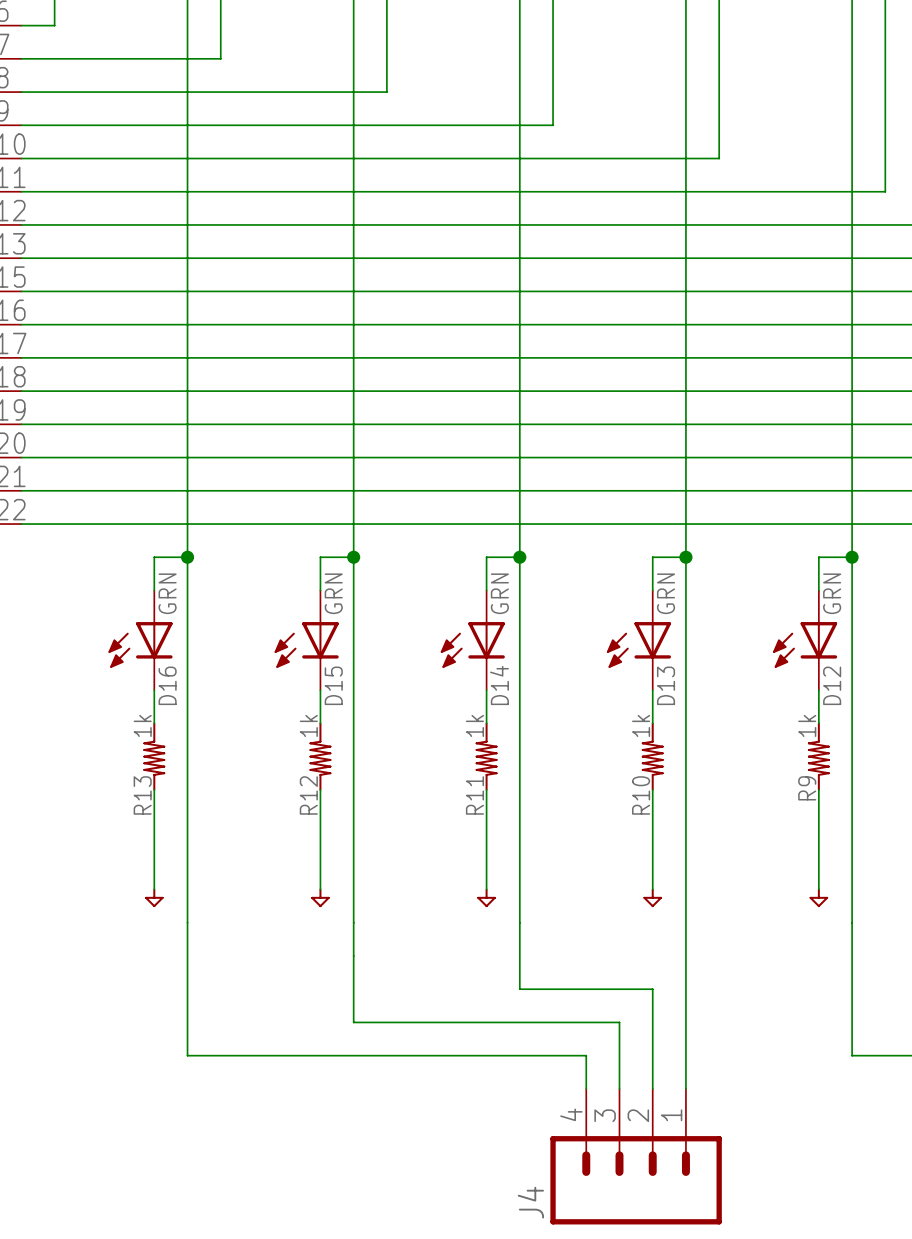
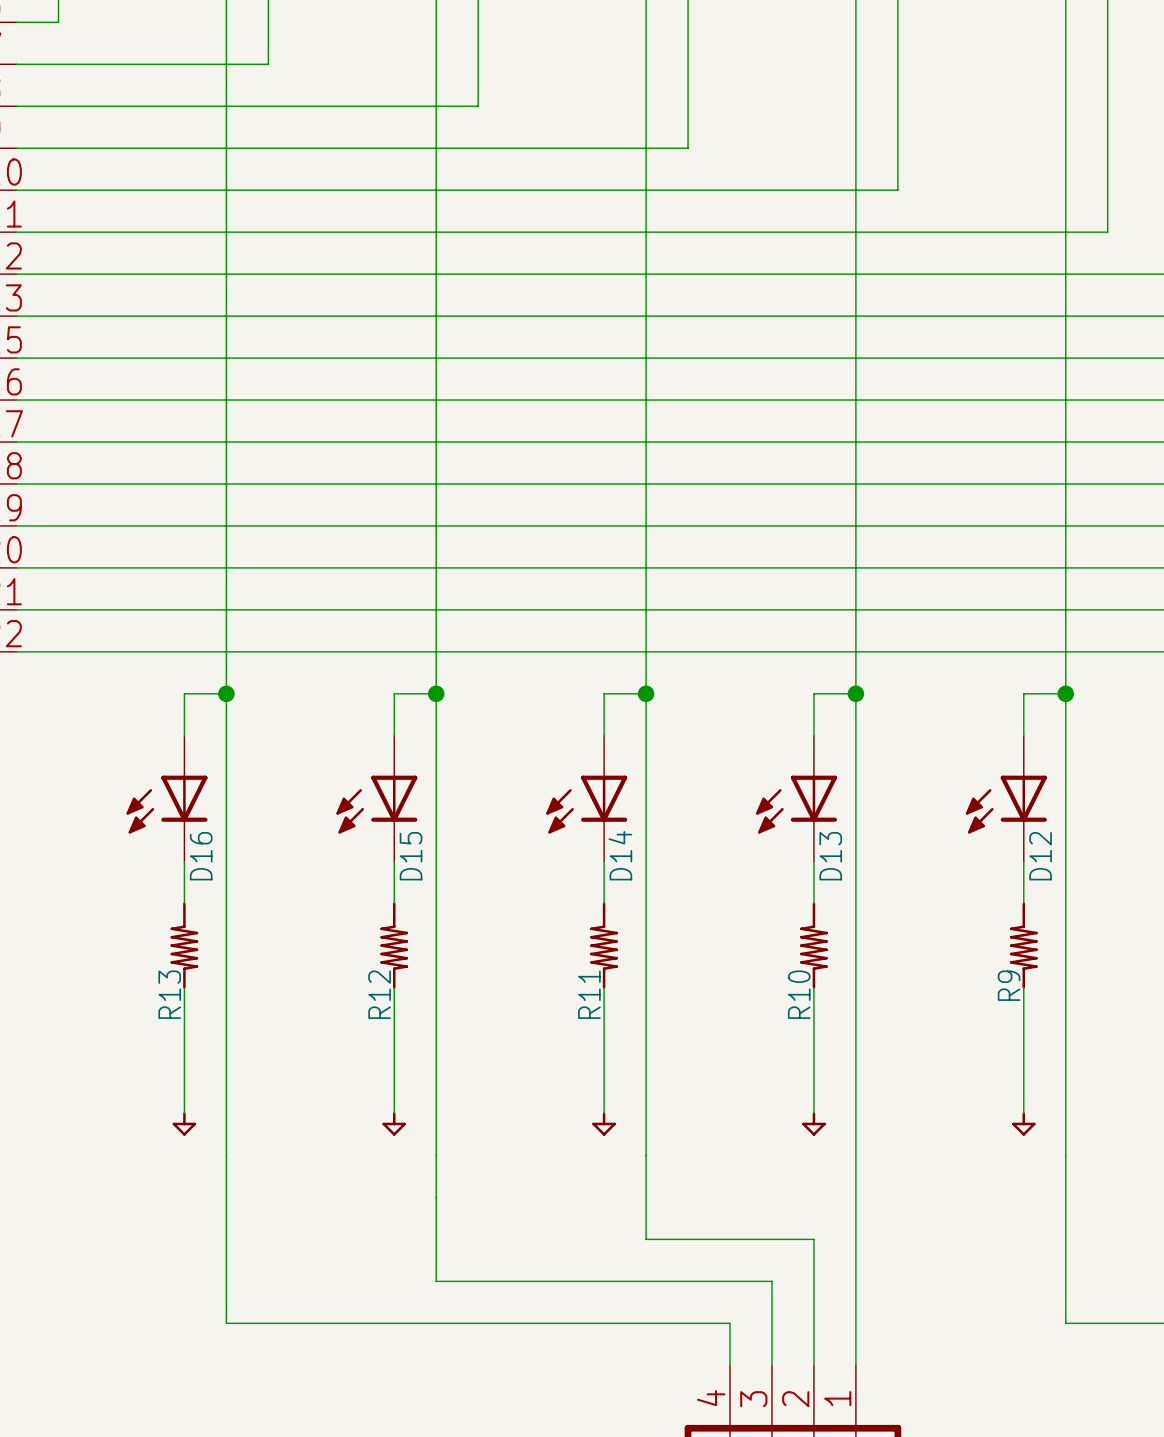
D16 value: GRN (167, 593) -> none
D15 value: GRN (333, 593) -> none
D14 value: GRN (499, 593) -> none
D13 value: GRN (666, 593) -> none
D12 value: GRN (832, 593) -> none
R13 value: 1k (142, 725) -> none
R12 value: 1k (308, 725) -> none
R11 value: 1k (474, 725) -> none
R10 value: 1k (641, 725) -> none
R9 value: 1k (807, 725) -> none

